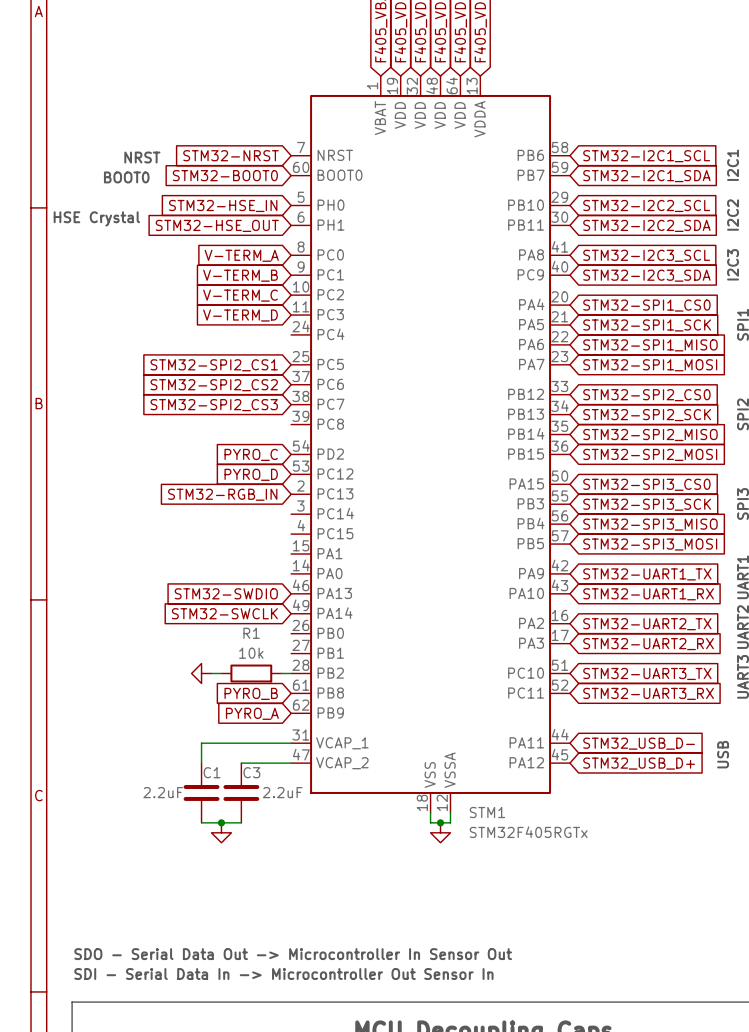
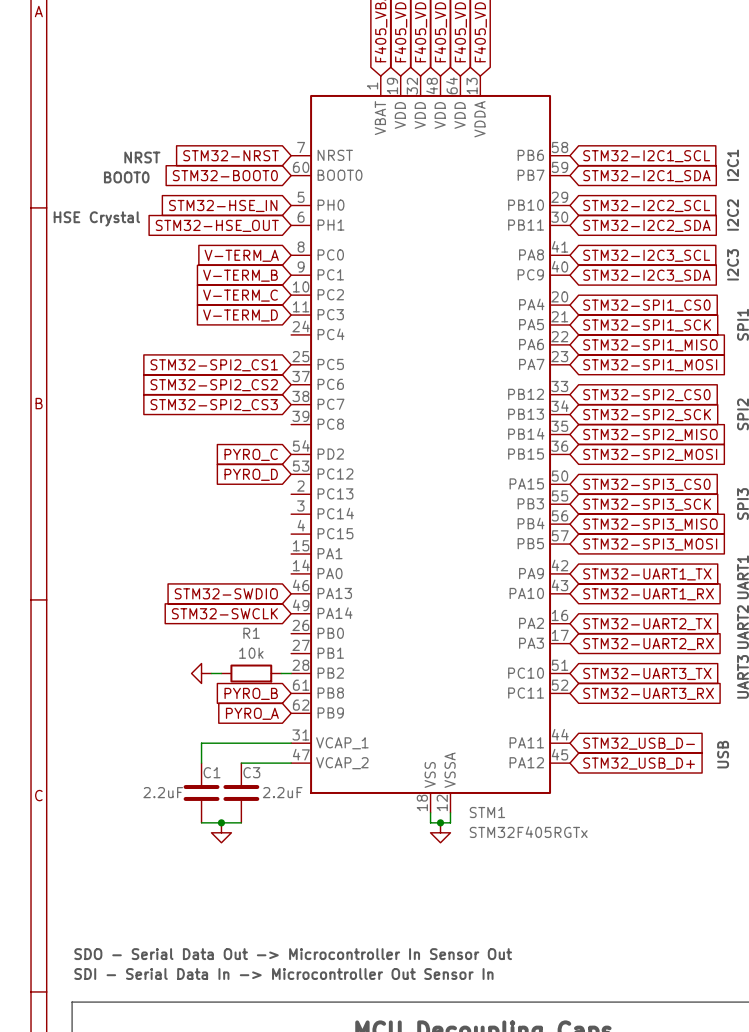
global label: STM32-RGB_IN (222, 494) -> none

